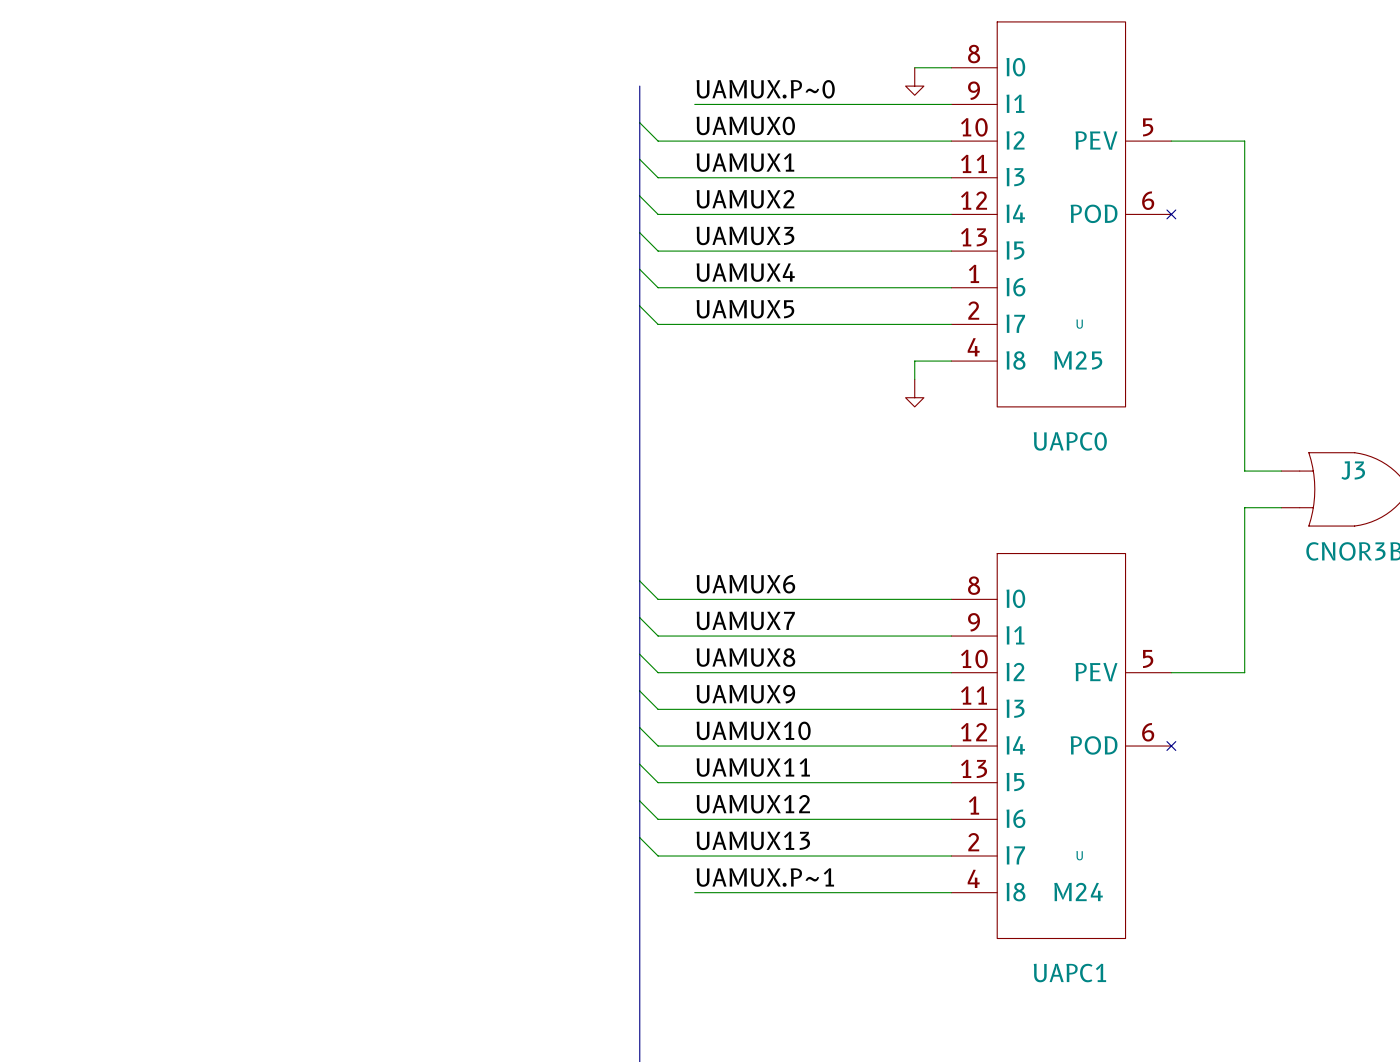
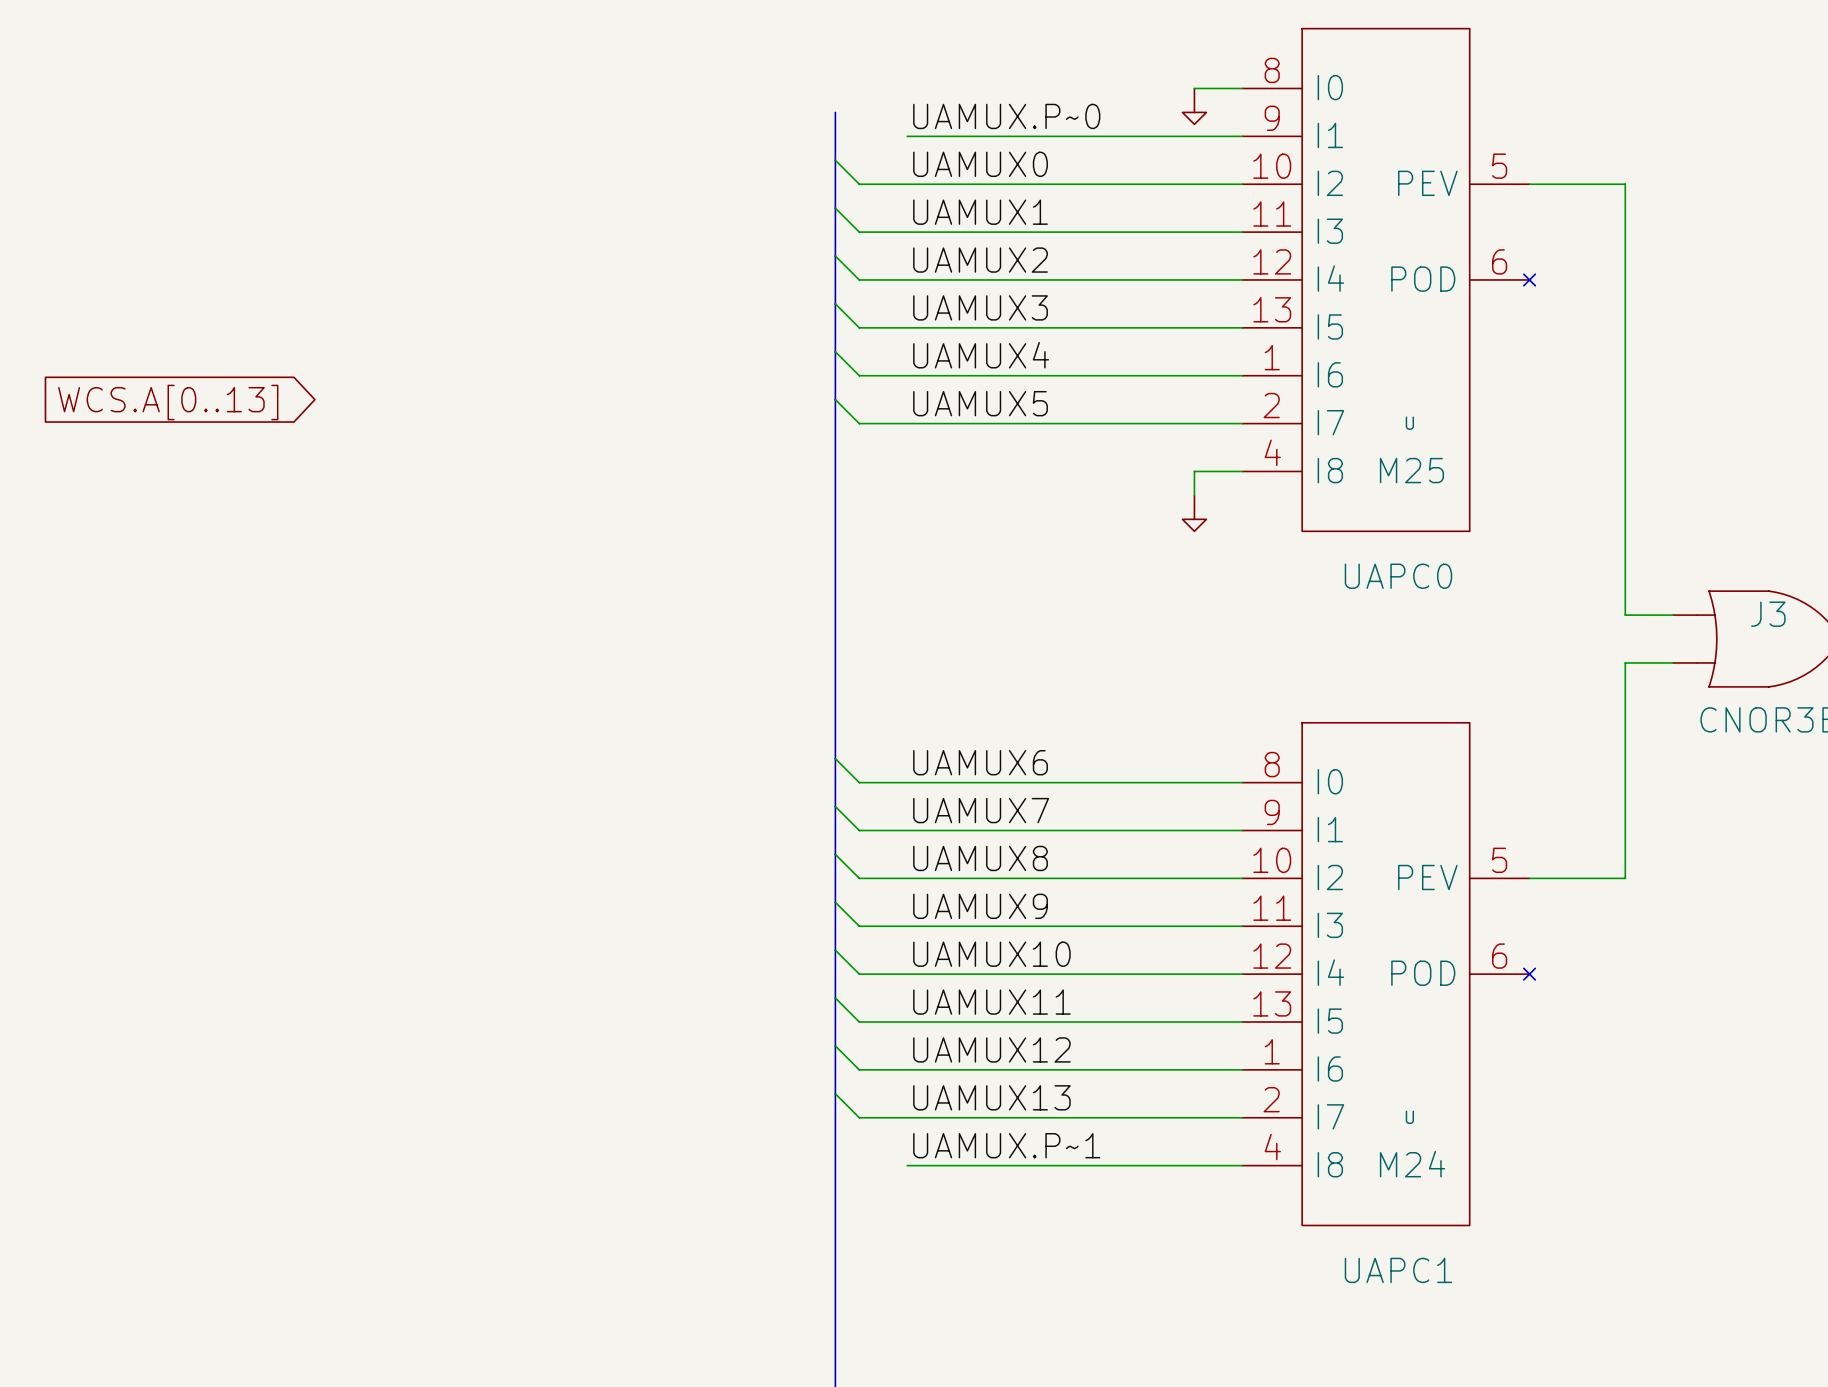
global label: none -> WCS.A[0..13] (168, 402)

